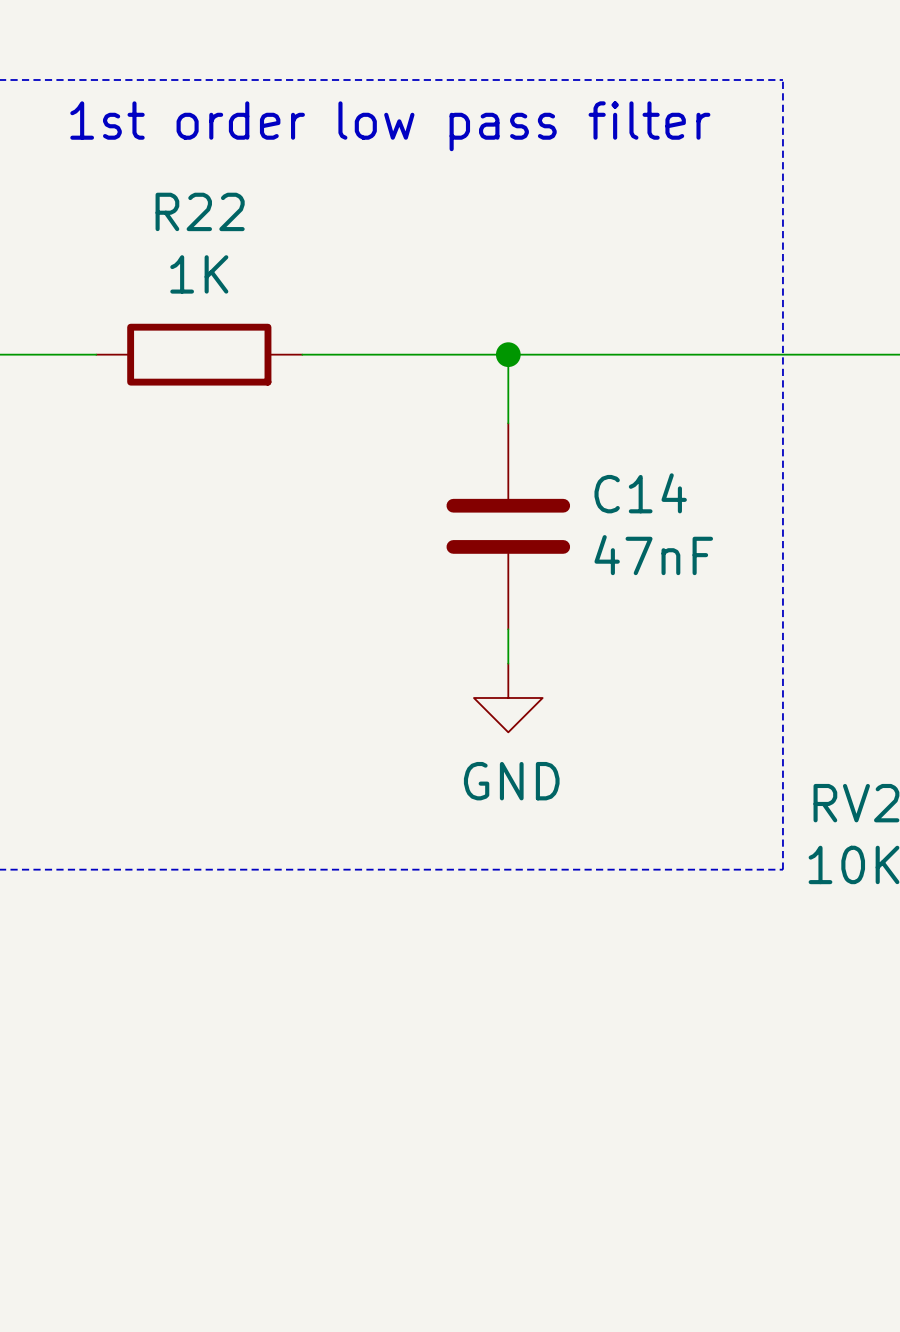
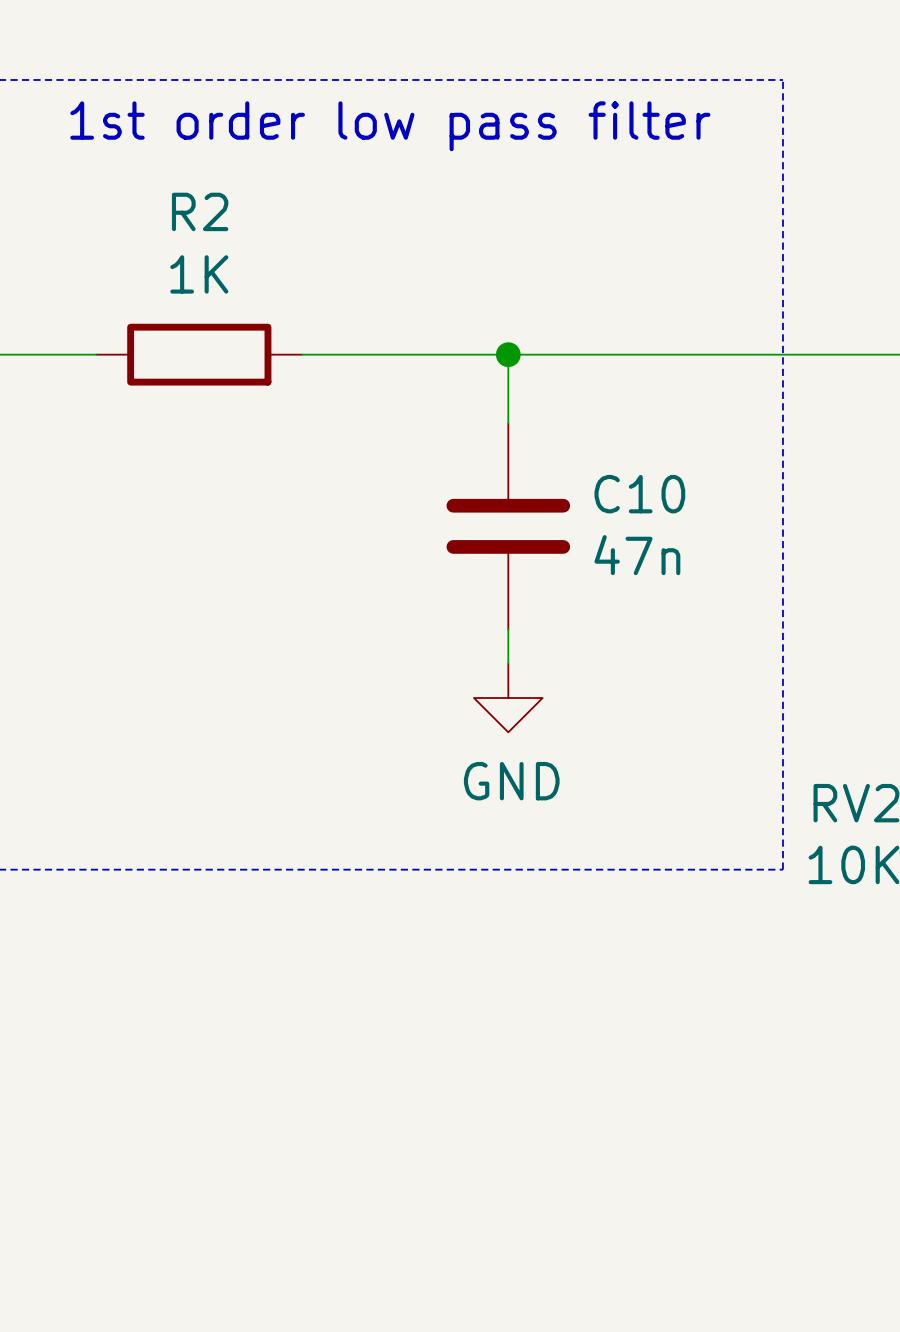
R22 name: R22 (200, 211) -> R2 (200, 211)
C14 name: C14 (640, 493) -> C10 (639, 494)
C14 value: 47nF (653, 555) -> 47n (637, 555)

